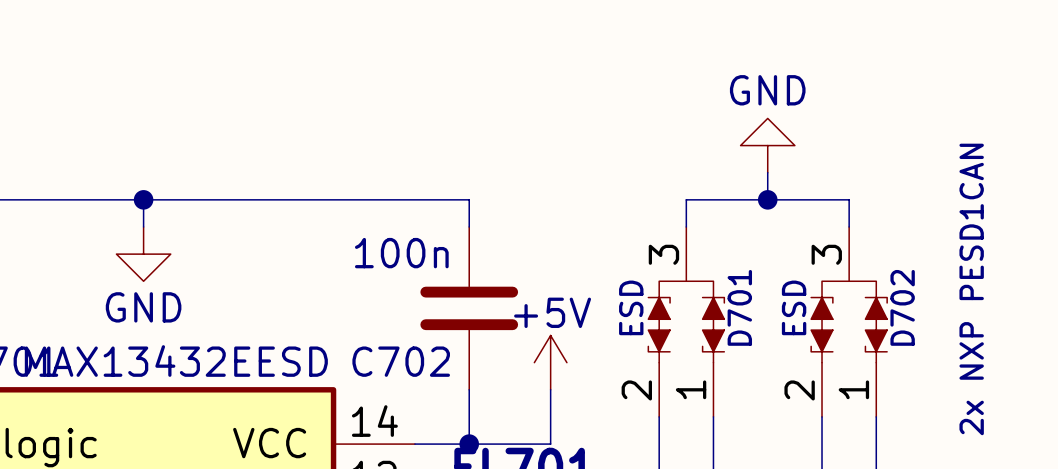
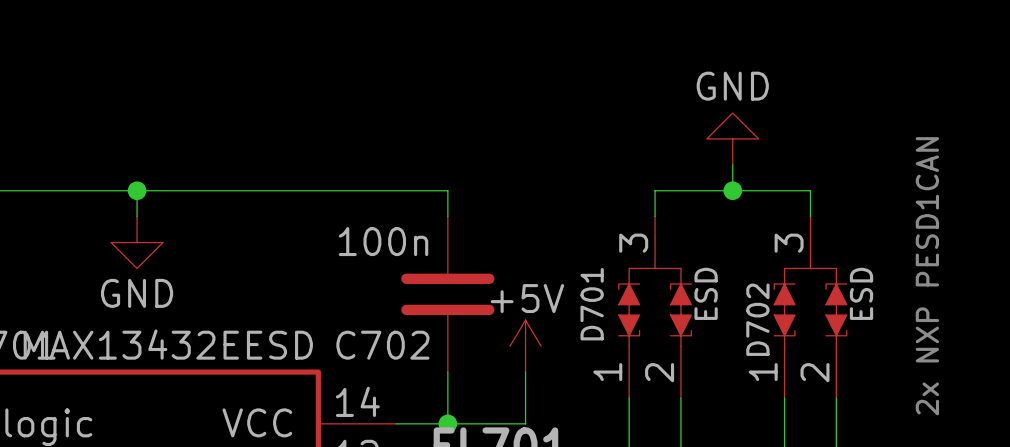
D701 flip: as is (686, 321) -> left-right (655, 307)
D702 flip: as is (849, 321) -> left-right (810, 307)

